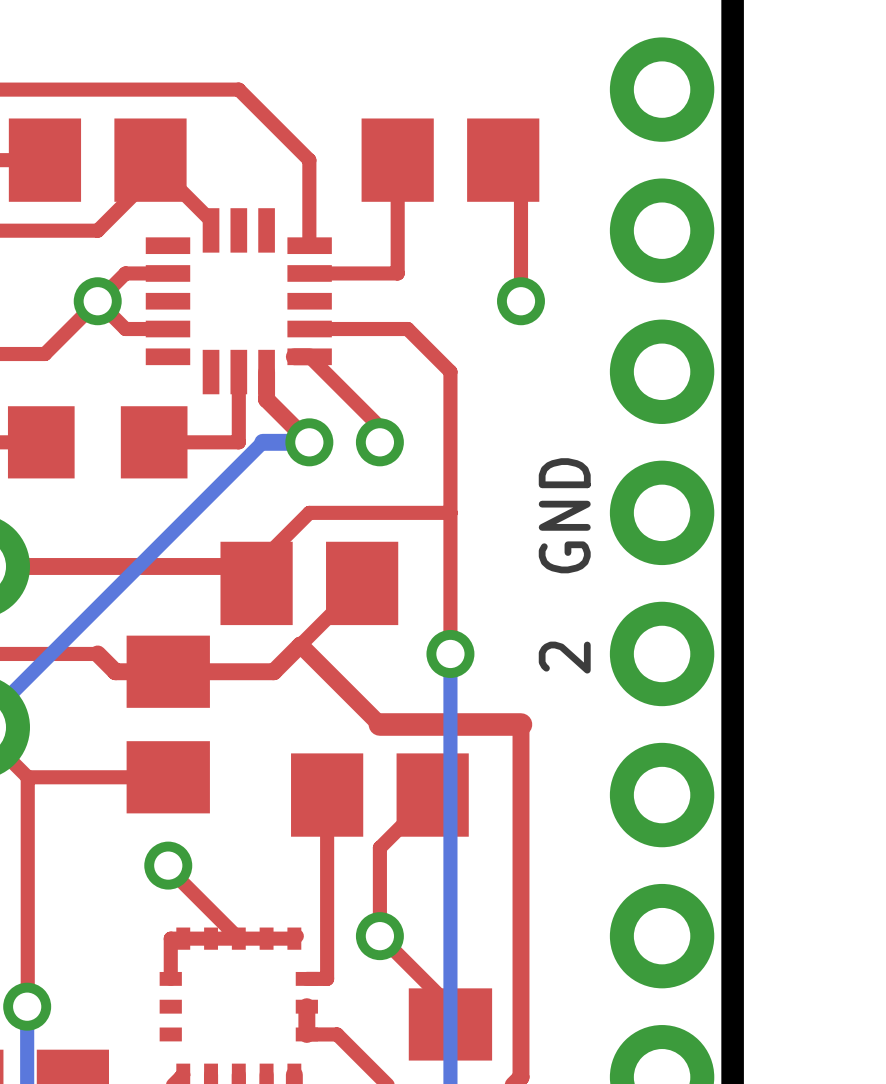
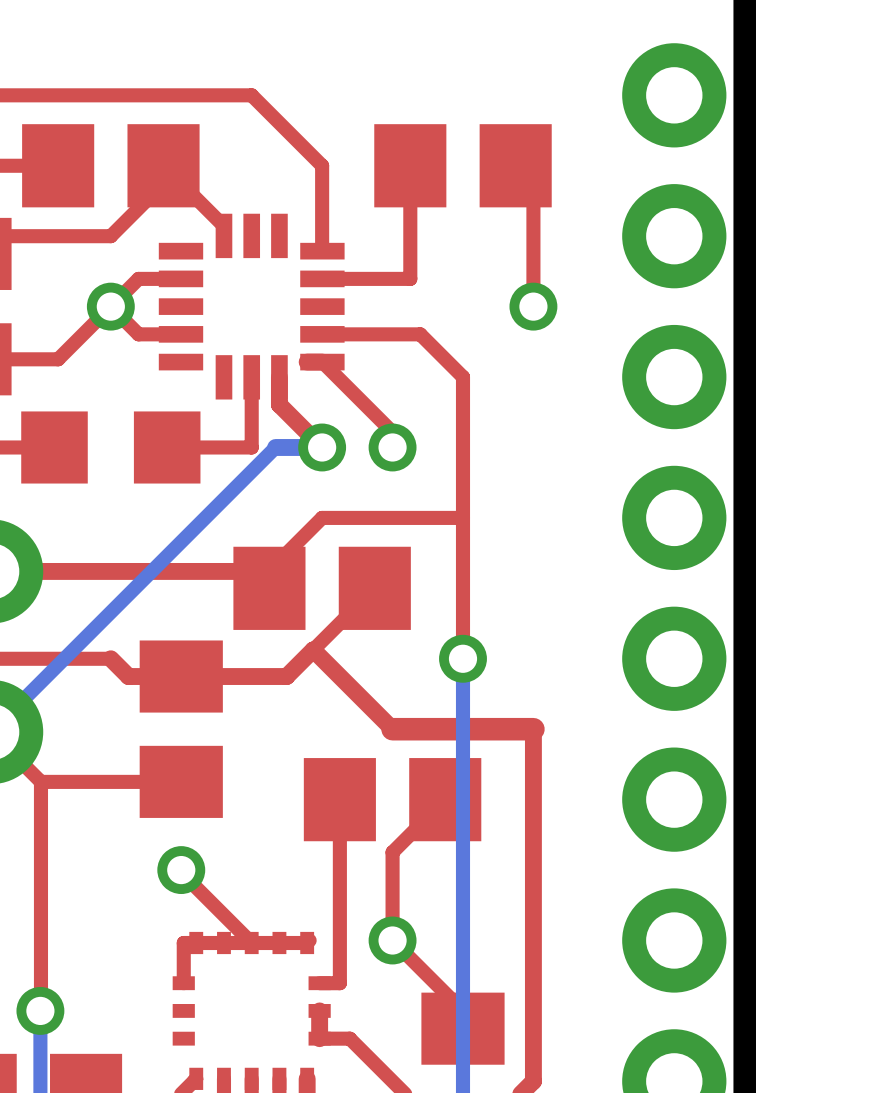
text: GND (564, 515) -> none
text: 2 (564, 657) -> none

